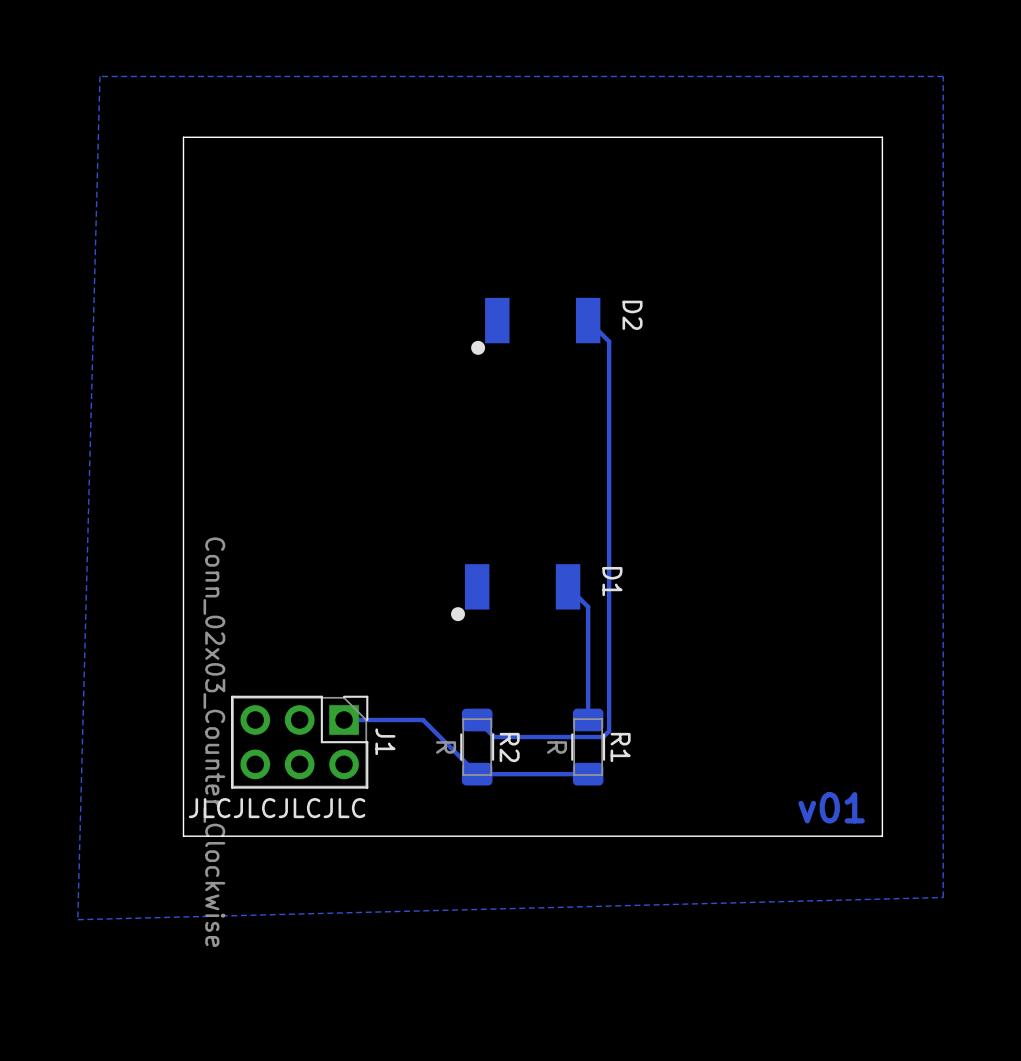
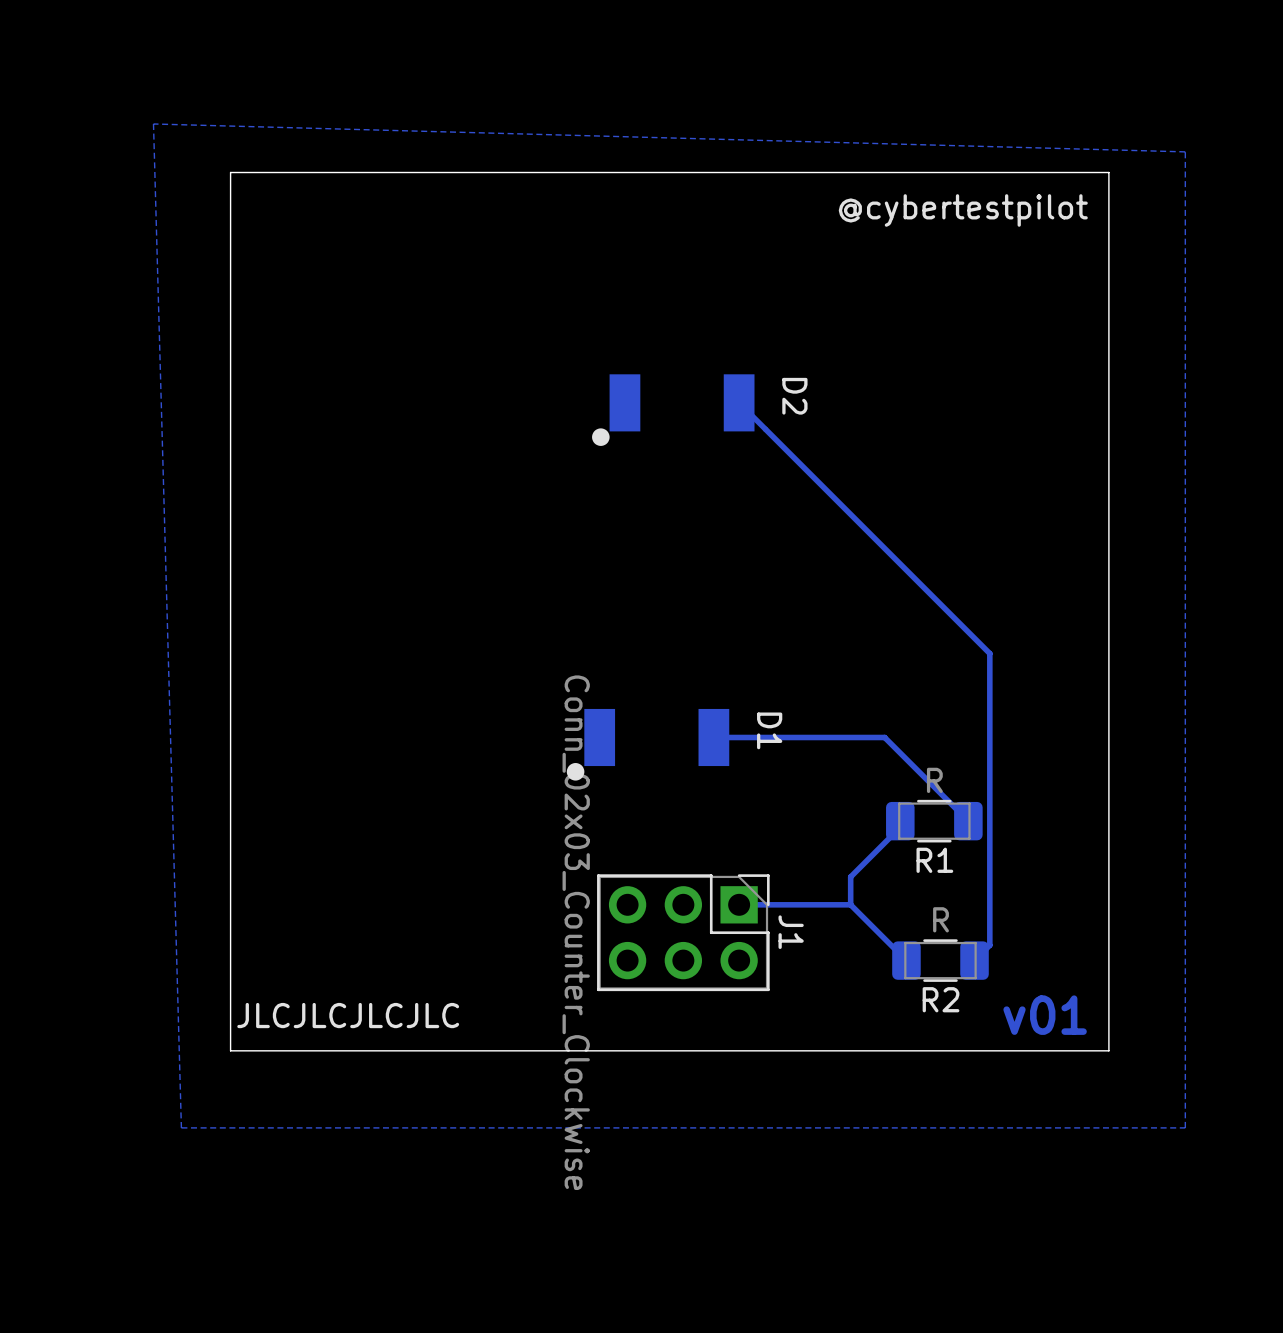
bottom zone outline: (943, 120) (943, 76) (99, 76) (77, 919) (943, 897) -> (1185, 151) (153, 123) (181, 1127) (1185, 1127)
text: none -> @cybertestpilot (963, 210)
bottom track: (609, 341) (609, 731) (603, 737) (494, 737) (477, 719) -> (765, 429) (989, 653) (989, 945) (974, 960)
bottom track: (568, 586) (588, 606) (588, 719) -> (850, 904) (739, 904)
bottom track: none -> (713, 737) (884, 737) (968, 821)
bottom track: none -> (900, 821) (900, 827) (850, 876) (850, 904)
bottom track: (344, 719) (423, 719) (477, 774) (588, 774) -> none
bottom track: none -> (850, 904) (906, 960)
J1 position: (299, 742) -> (683, 932)
R2 rotation: 0° (477, 747) -> 90° clockwise (940, 960)
R2 position: (477, 747) -> (940, 960)
R1 rotation: 0° (588, 747) -> 90° clockwise (934, 821)
R1 position: (588, 747) -> (934, 821)

